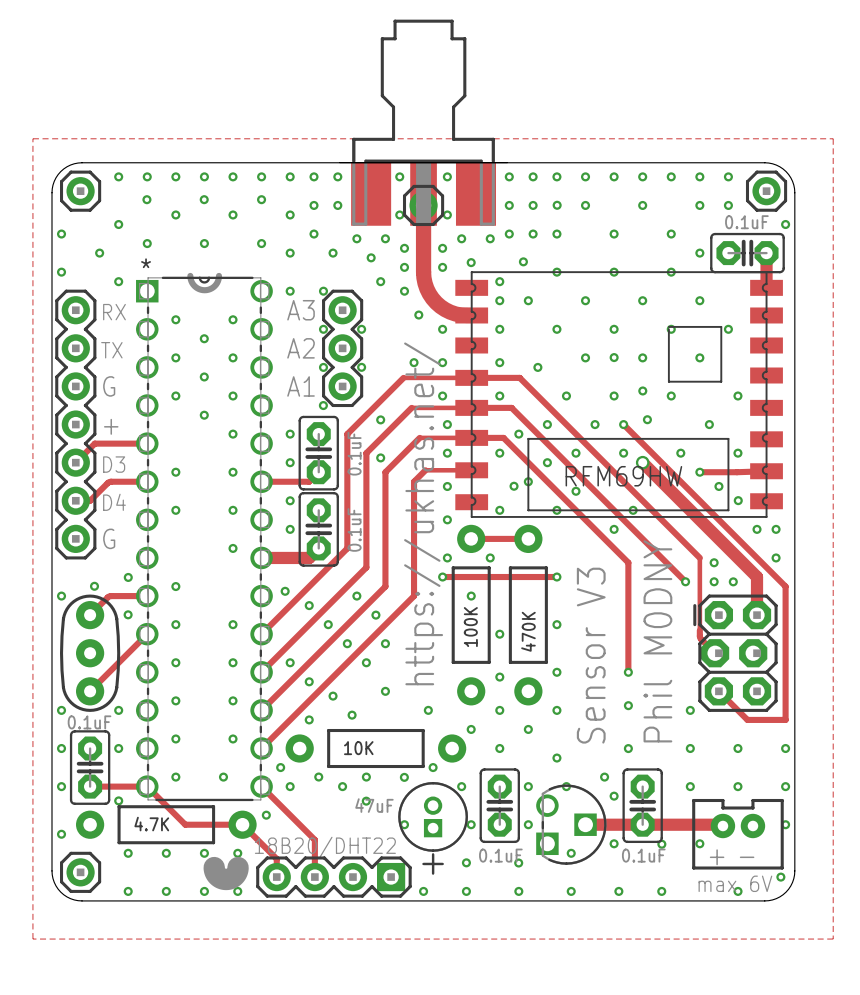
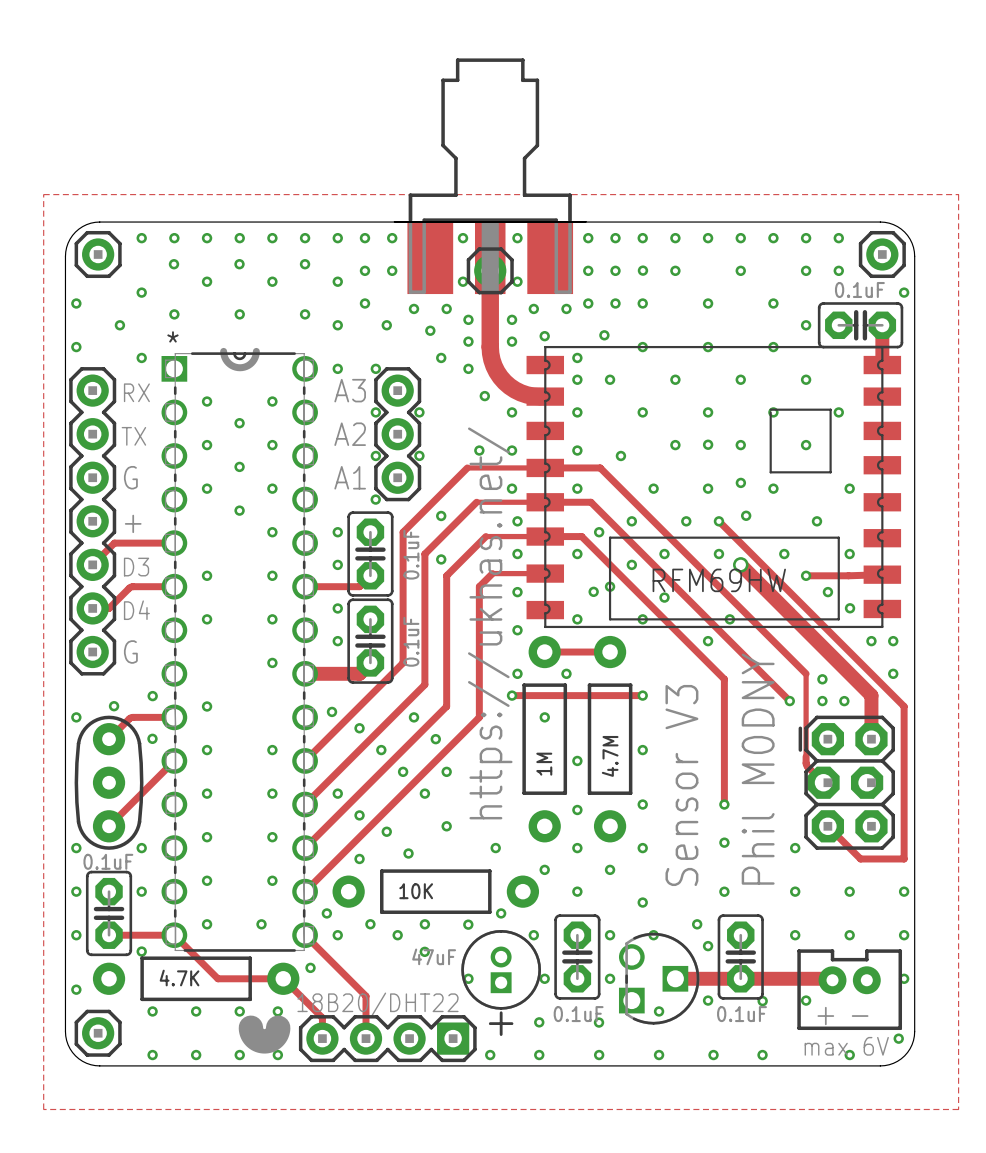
part value: 100K (470, 627) -> 1M (544, 764)
part value: 470K (528, 631) -> 4.7M (610, 756)

